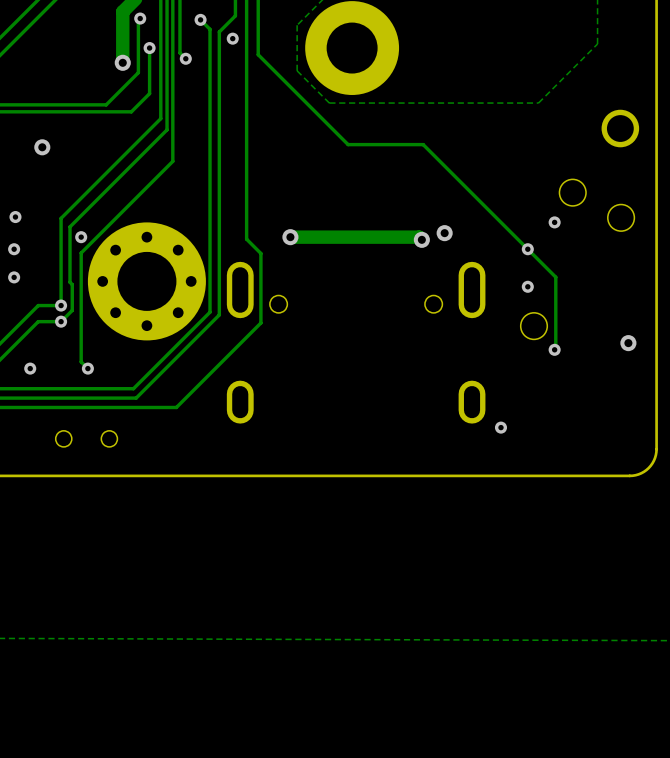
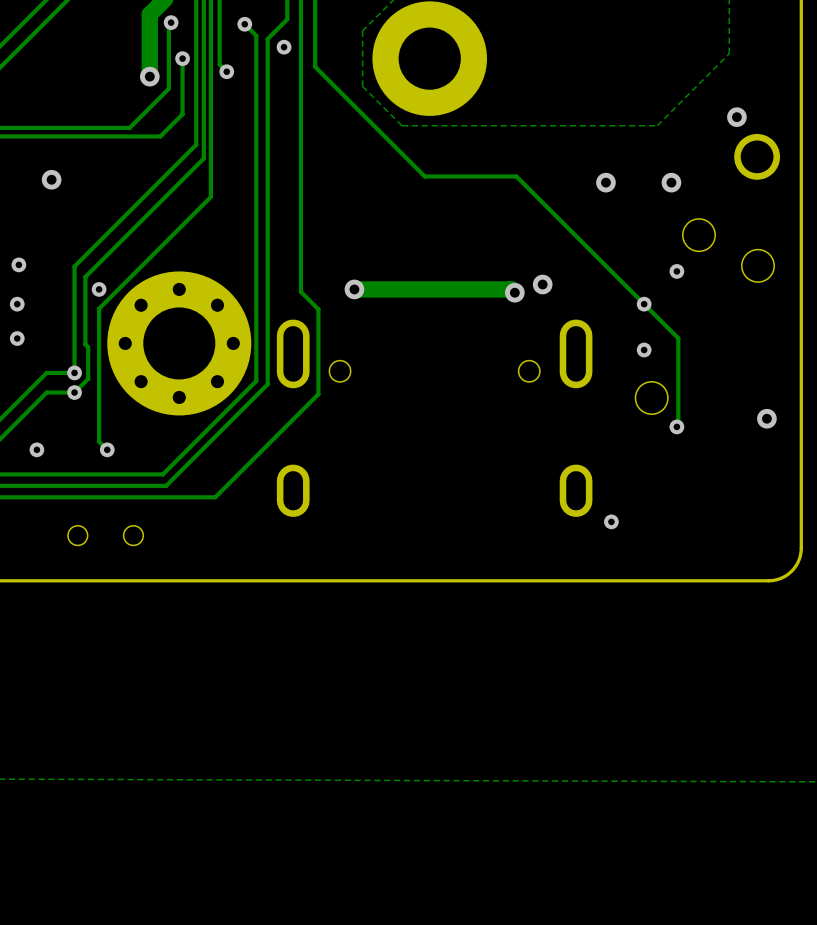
via: none -> (736, 117)
via: none -> (605, 182)
via: none -> (671, 182)

